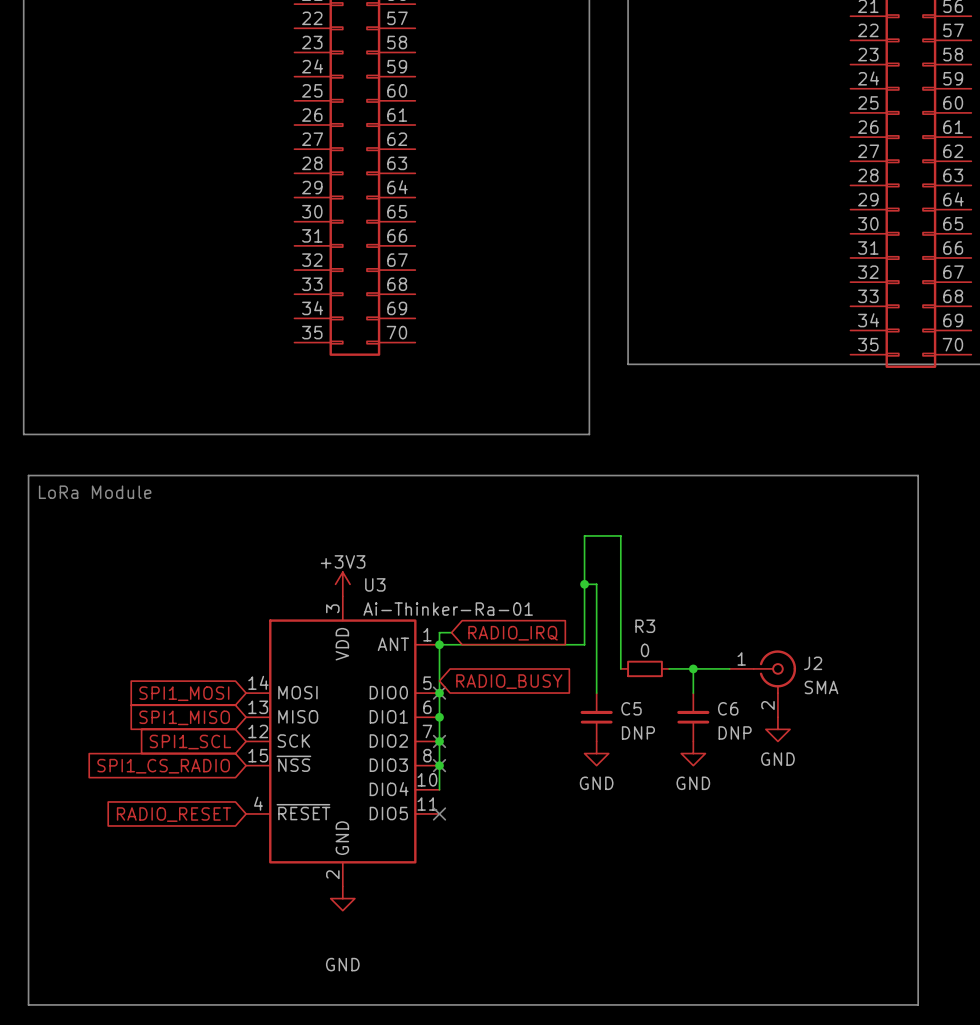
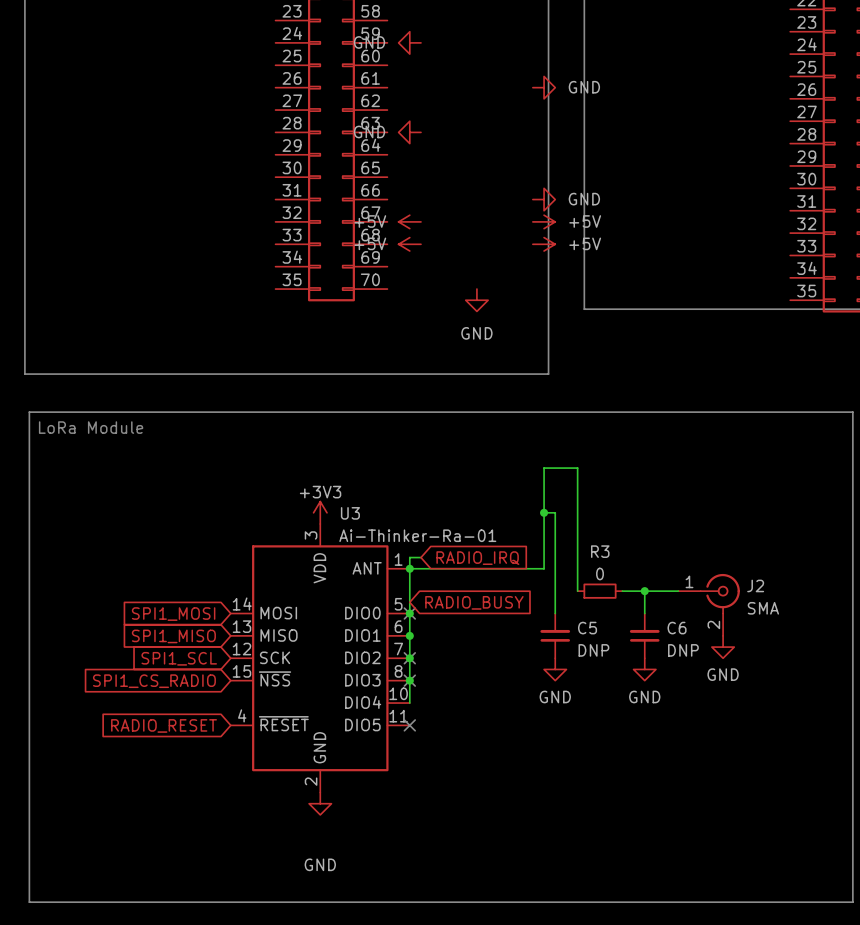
power symbol: none -> GND (409, 42)
power symbol: none -> GND (544, 87)
power symbol: none -> GND (409, 132)
power symbol: none -> GND (544, 199)
power symbol: none -> +5V (409, 221)
power symbol: none -> +5V (544, 221)
power symbol: none -> +5V (409, 244)
power symbol: none -> +5V (544, 244)
power symbol: none -> GND (476, 300)

